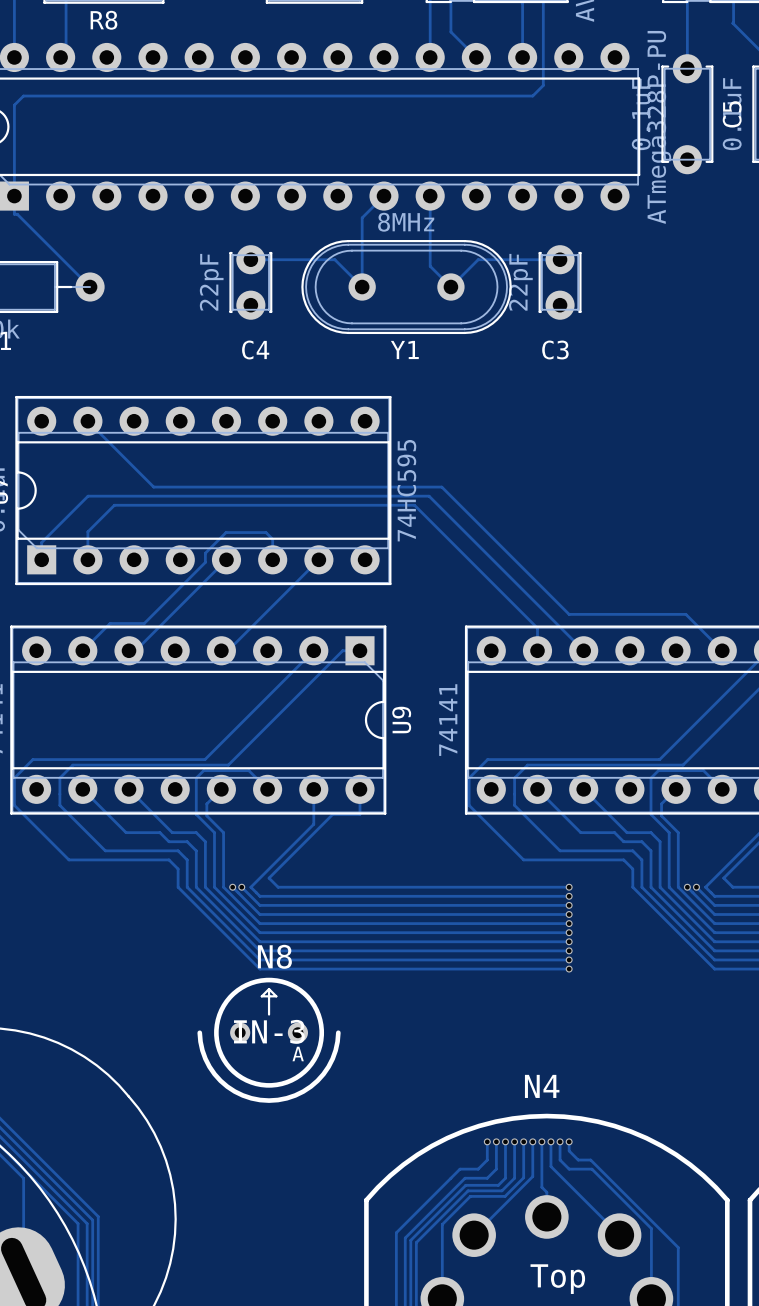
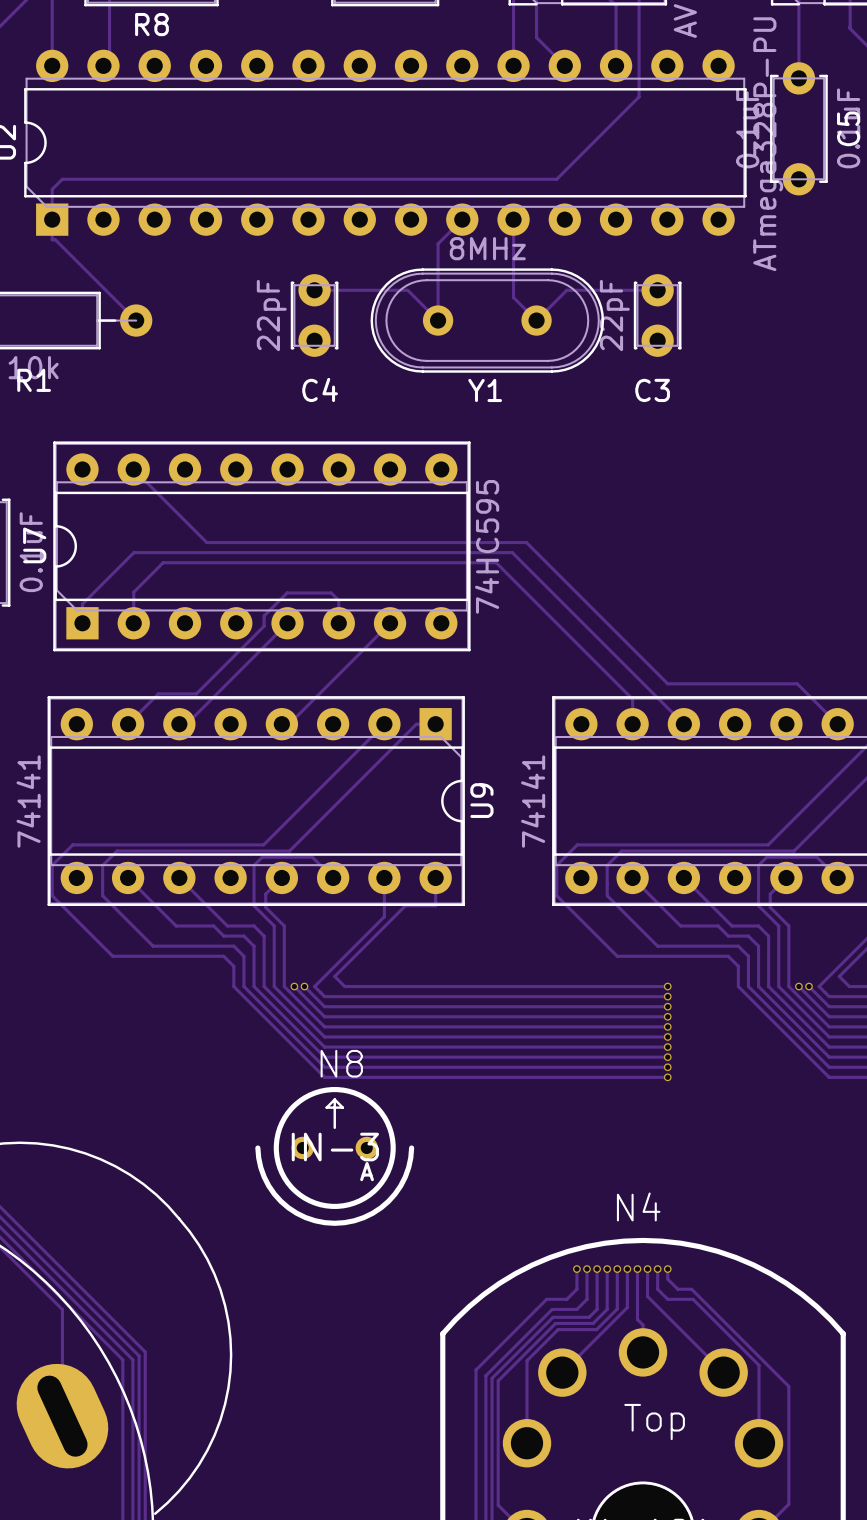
track: (532, 96) (23, 96) (14, 105) (14, 168) -> (627, 108) (556, 179) (62, 179) (52, 189)

